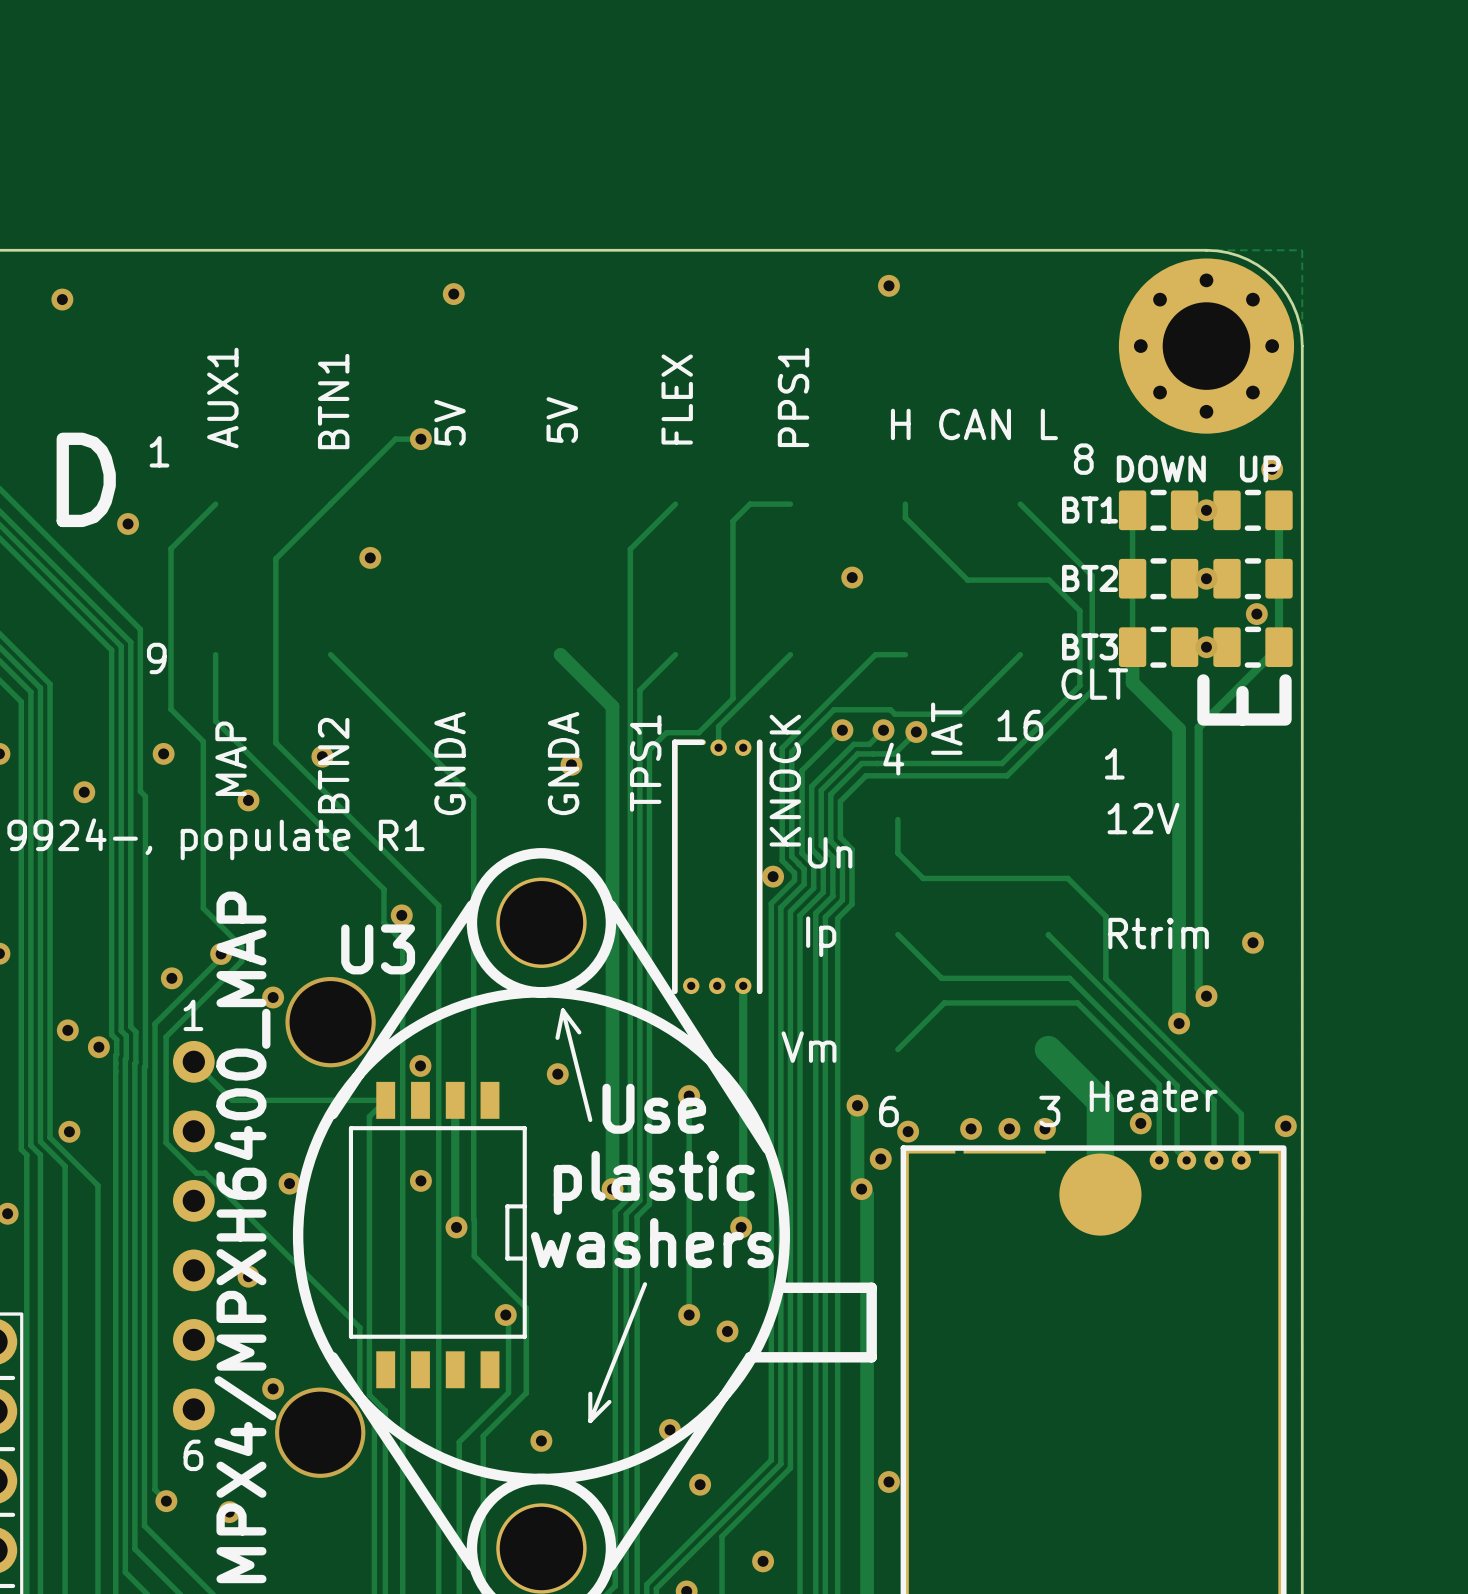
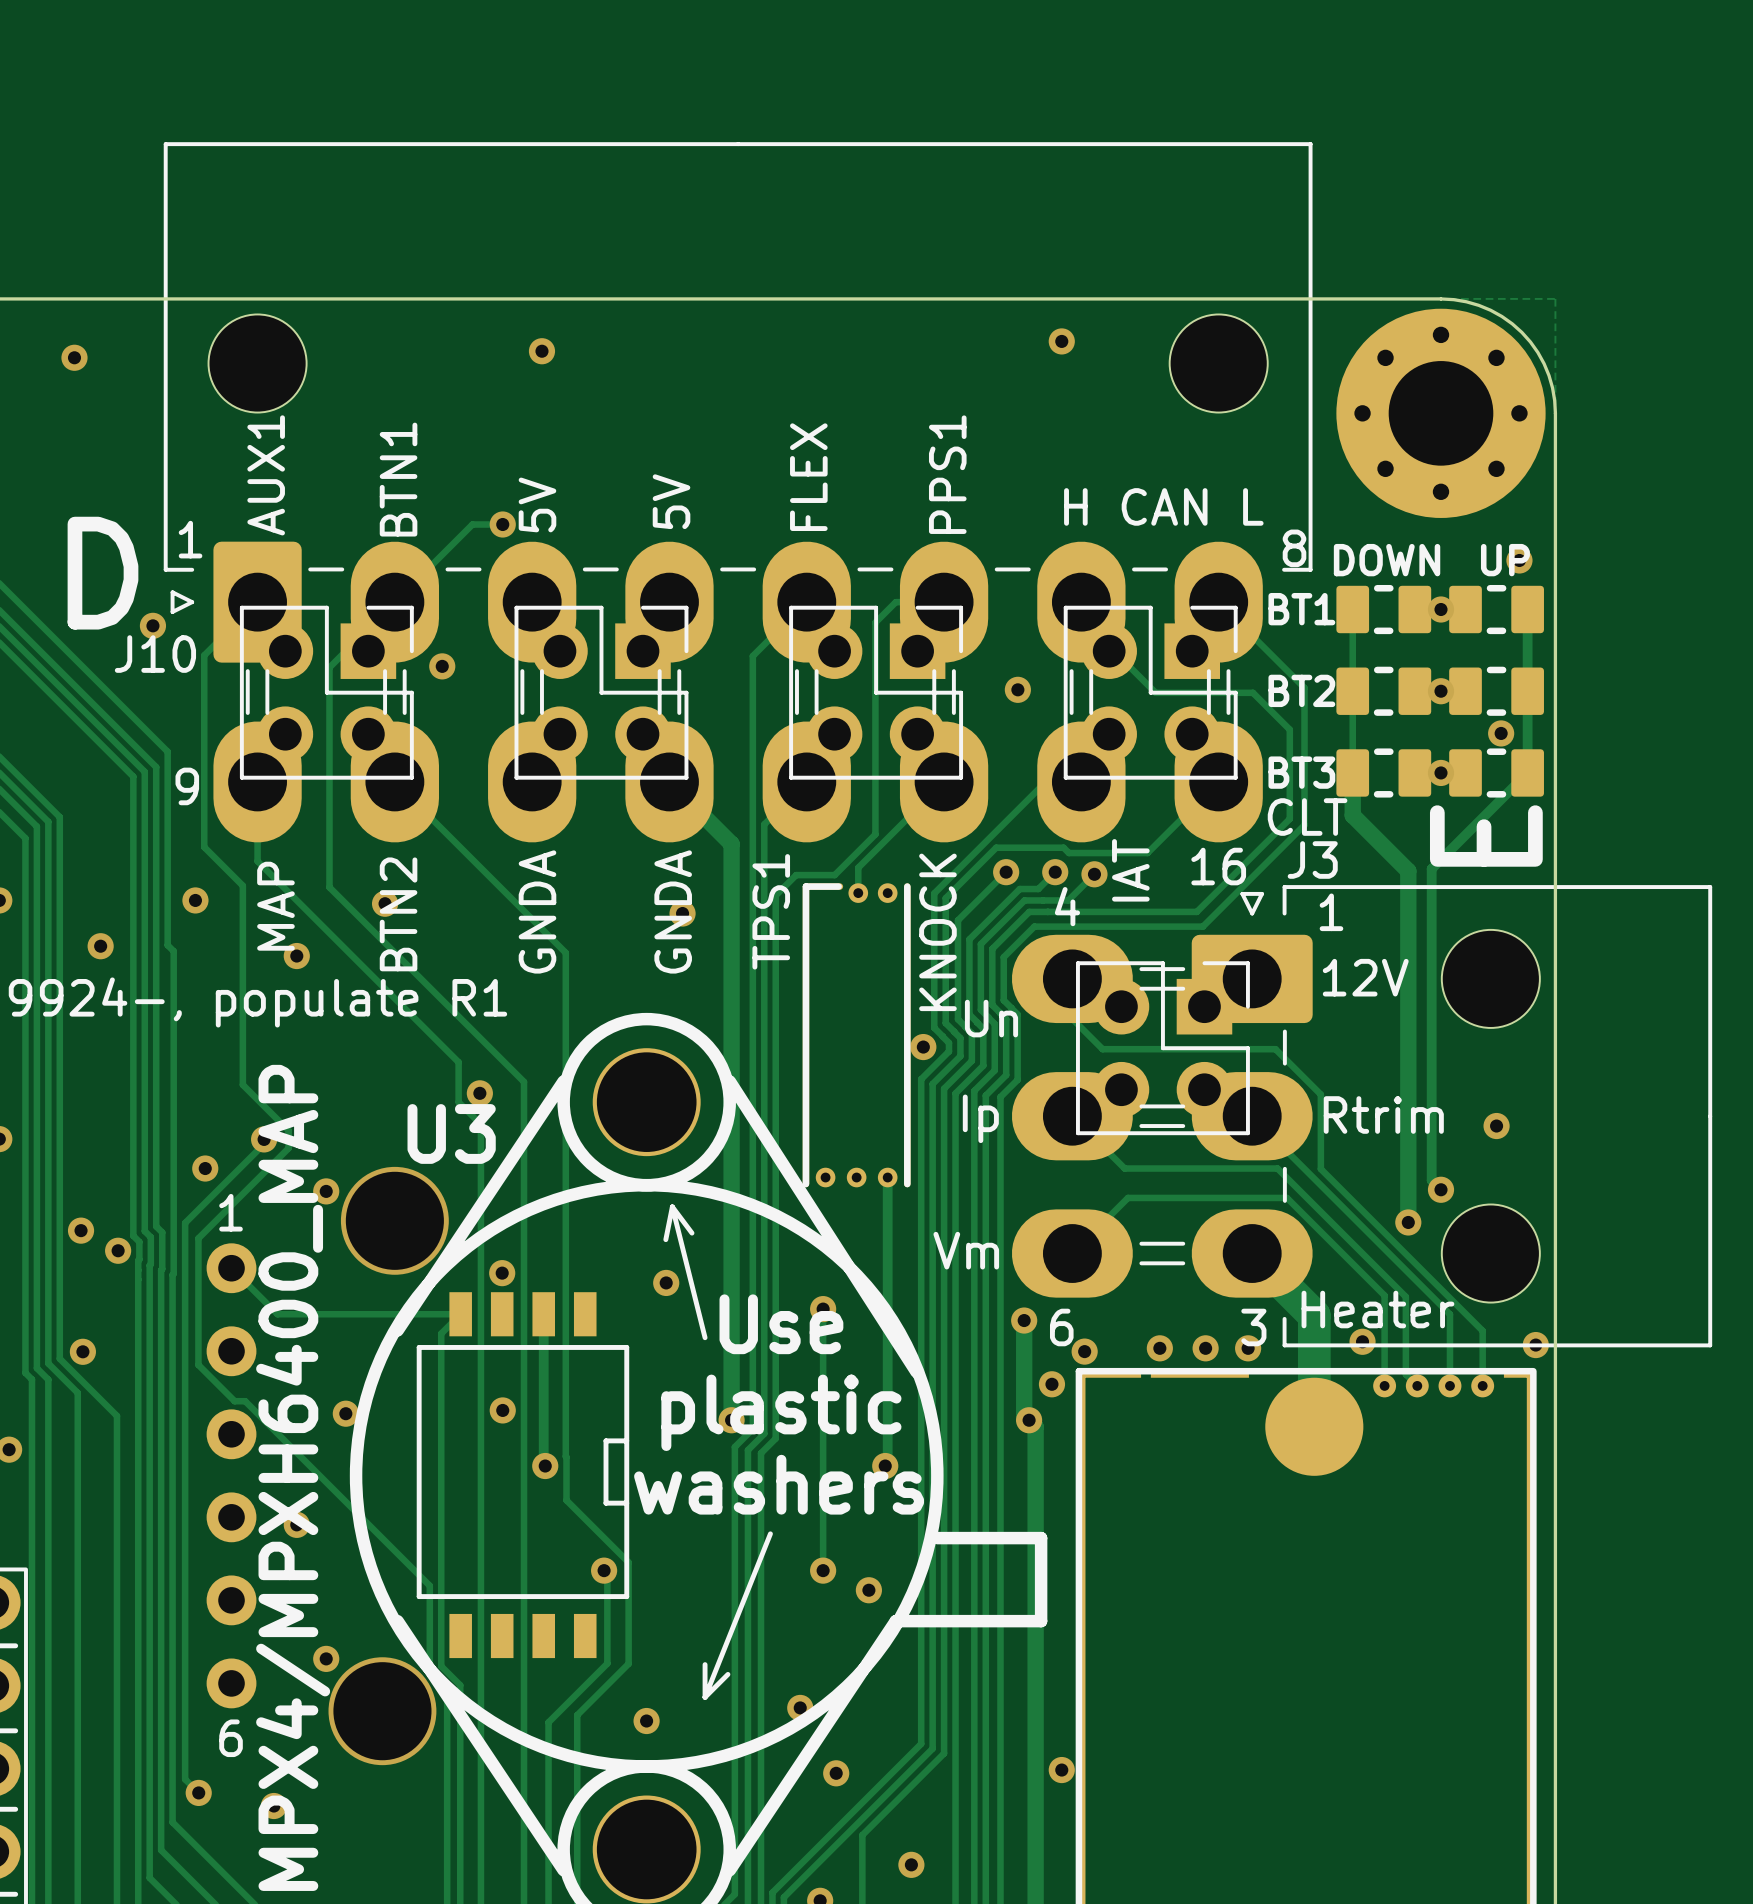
J10: none -> (738, 492)
part: none -> (326, 692)
part: none -> (601, 692)
part: none -> (876, 692)
part: none -> (1150, 692)
part: none -> (1162, 1048)
J3: none -> (1362, 1116)

